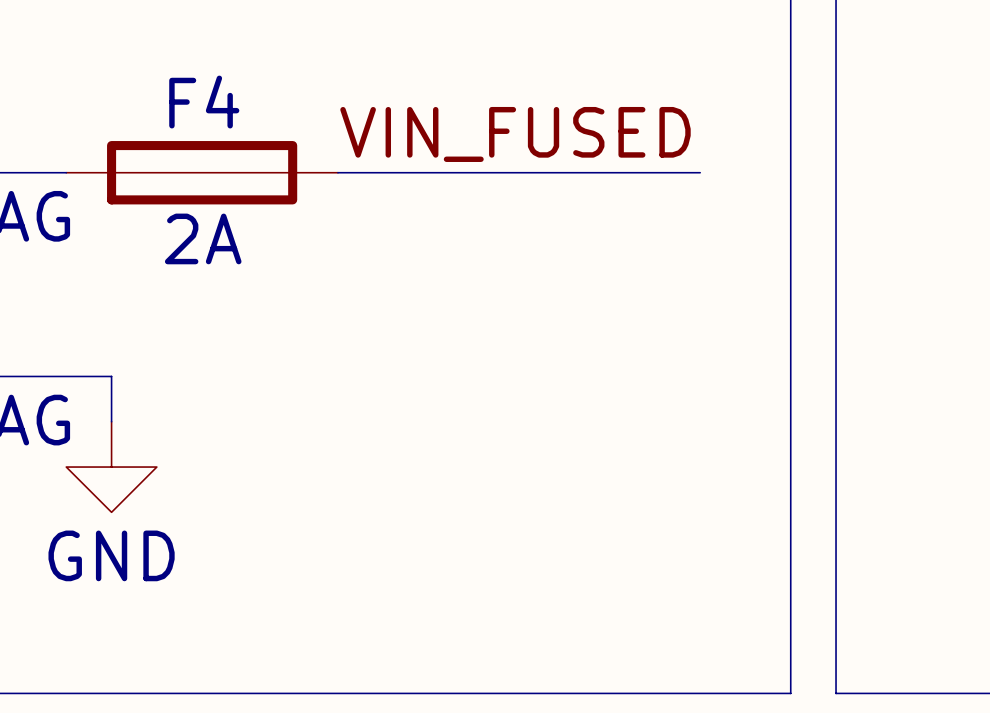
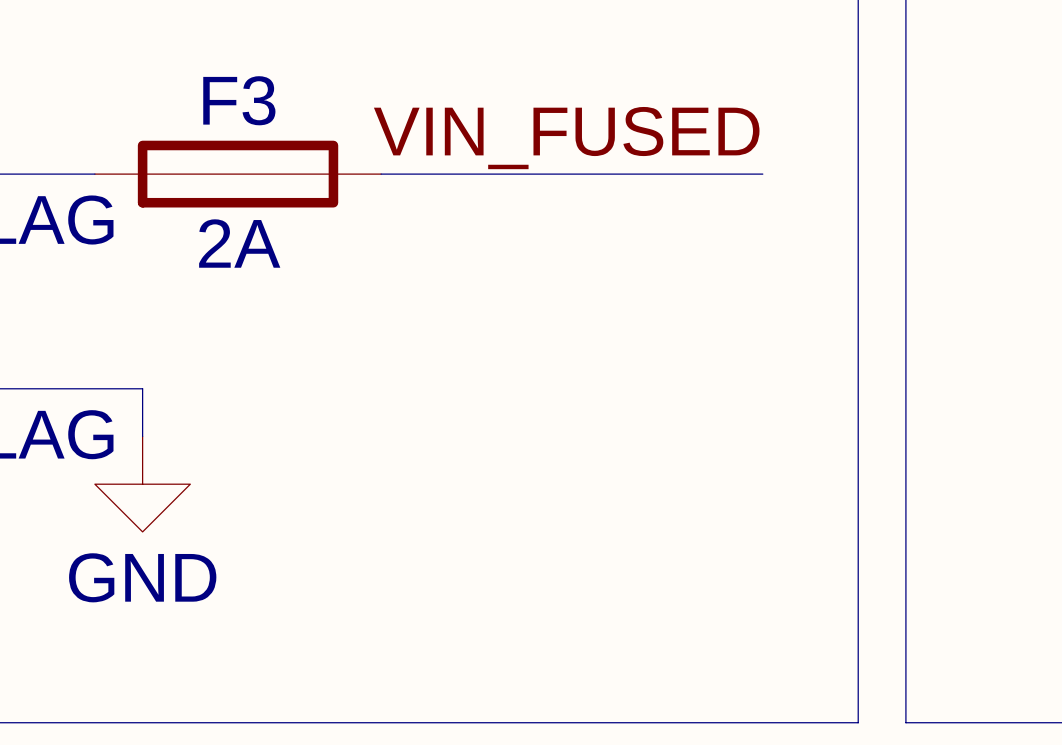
F4 name: F4 (204, 102) -> F3 (239, 100)

